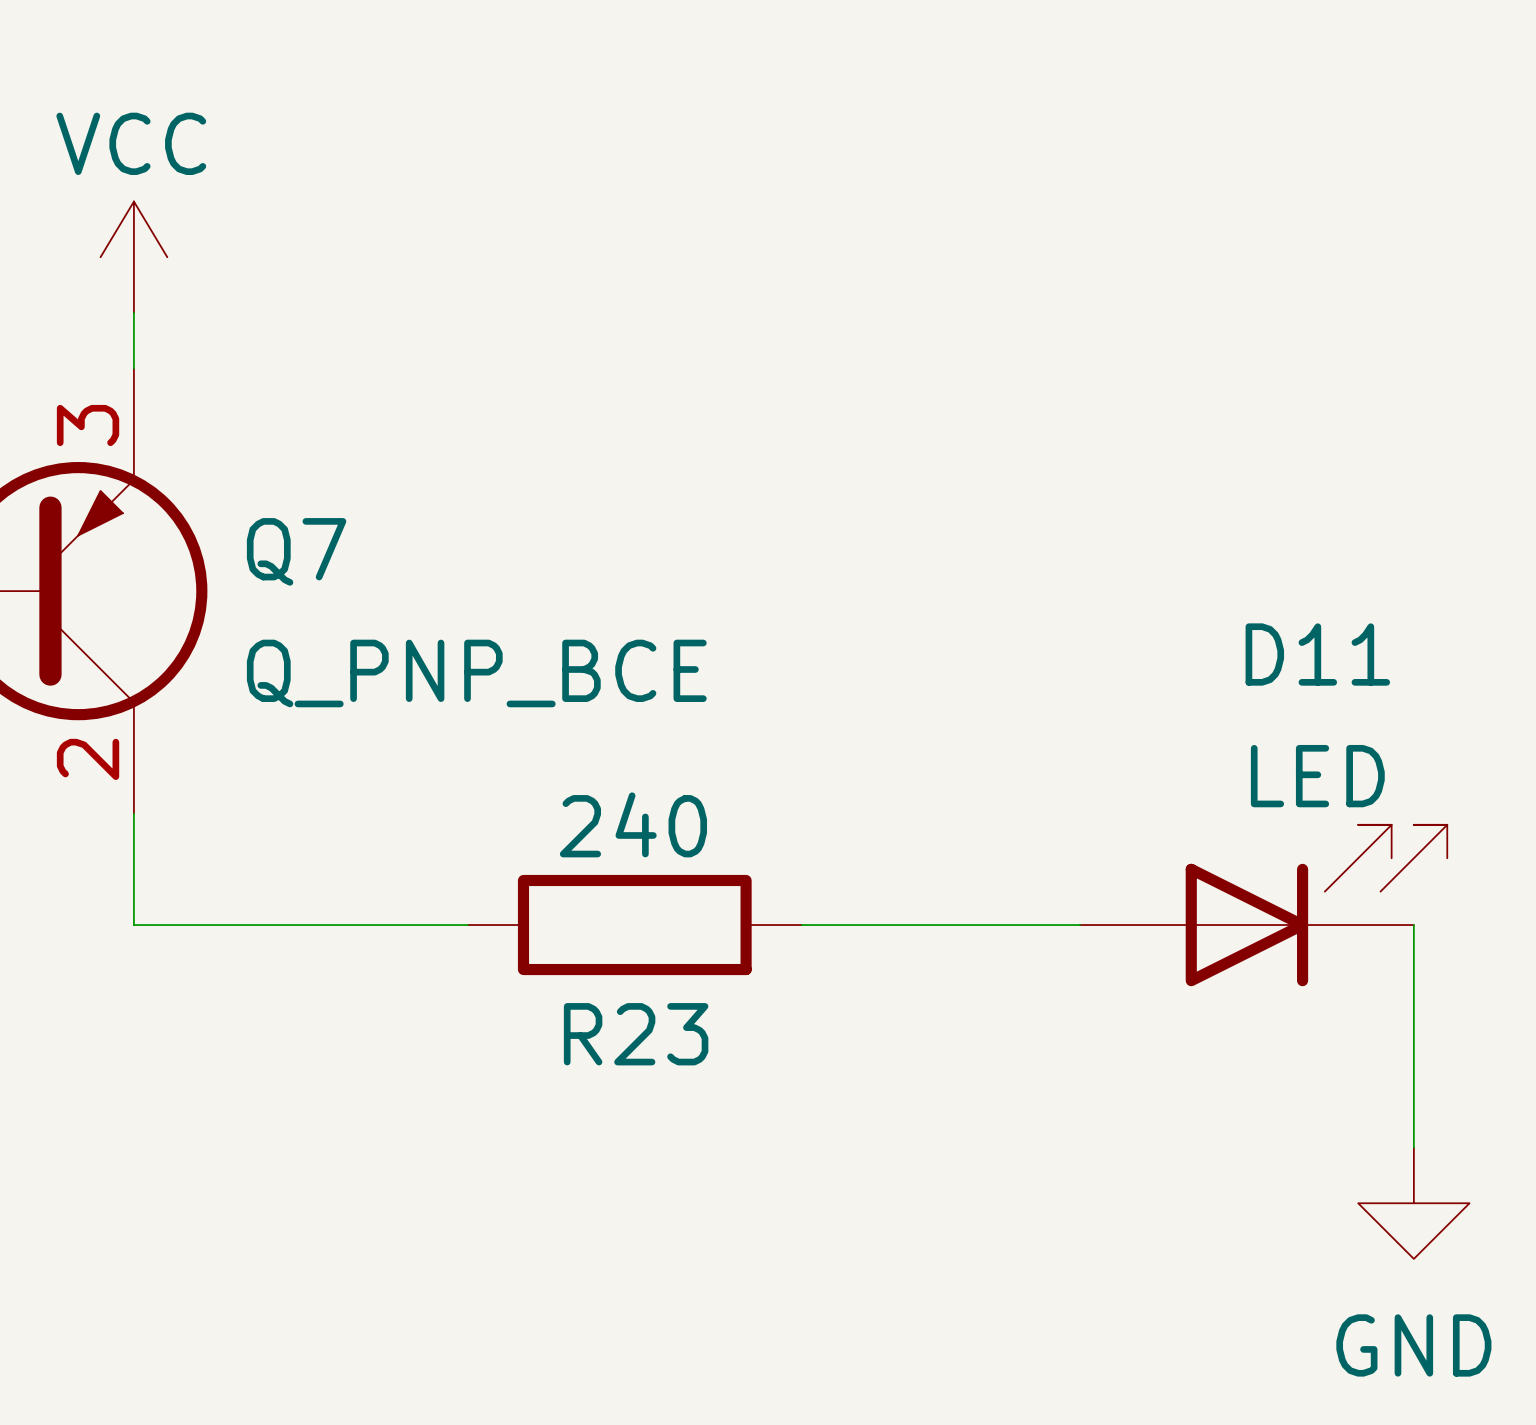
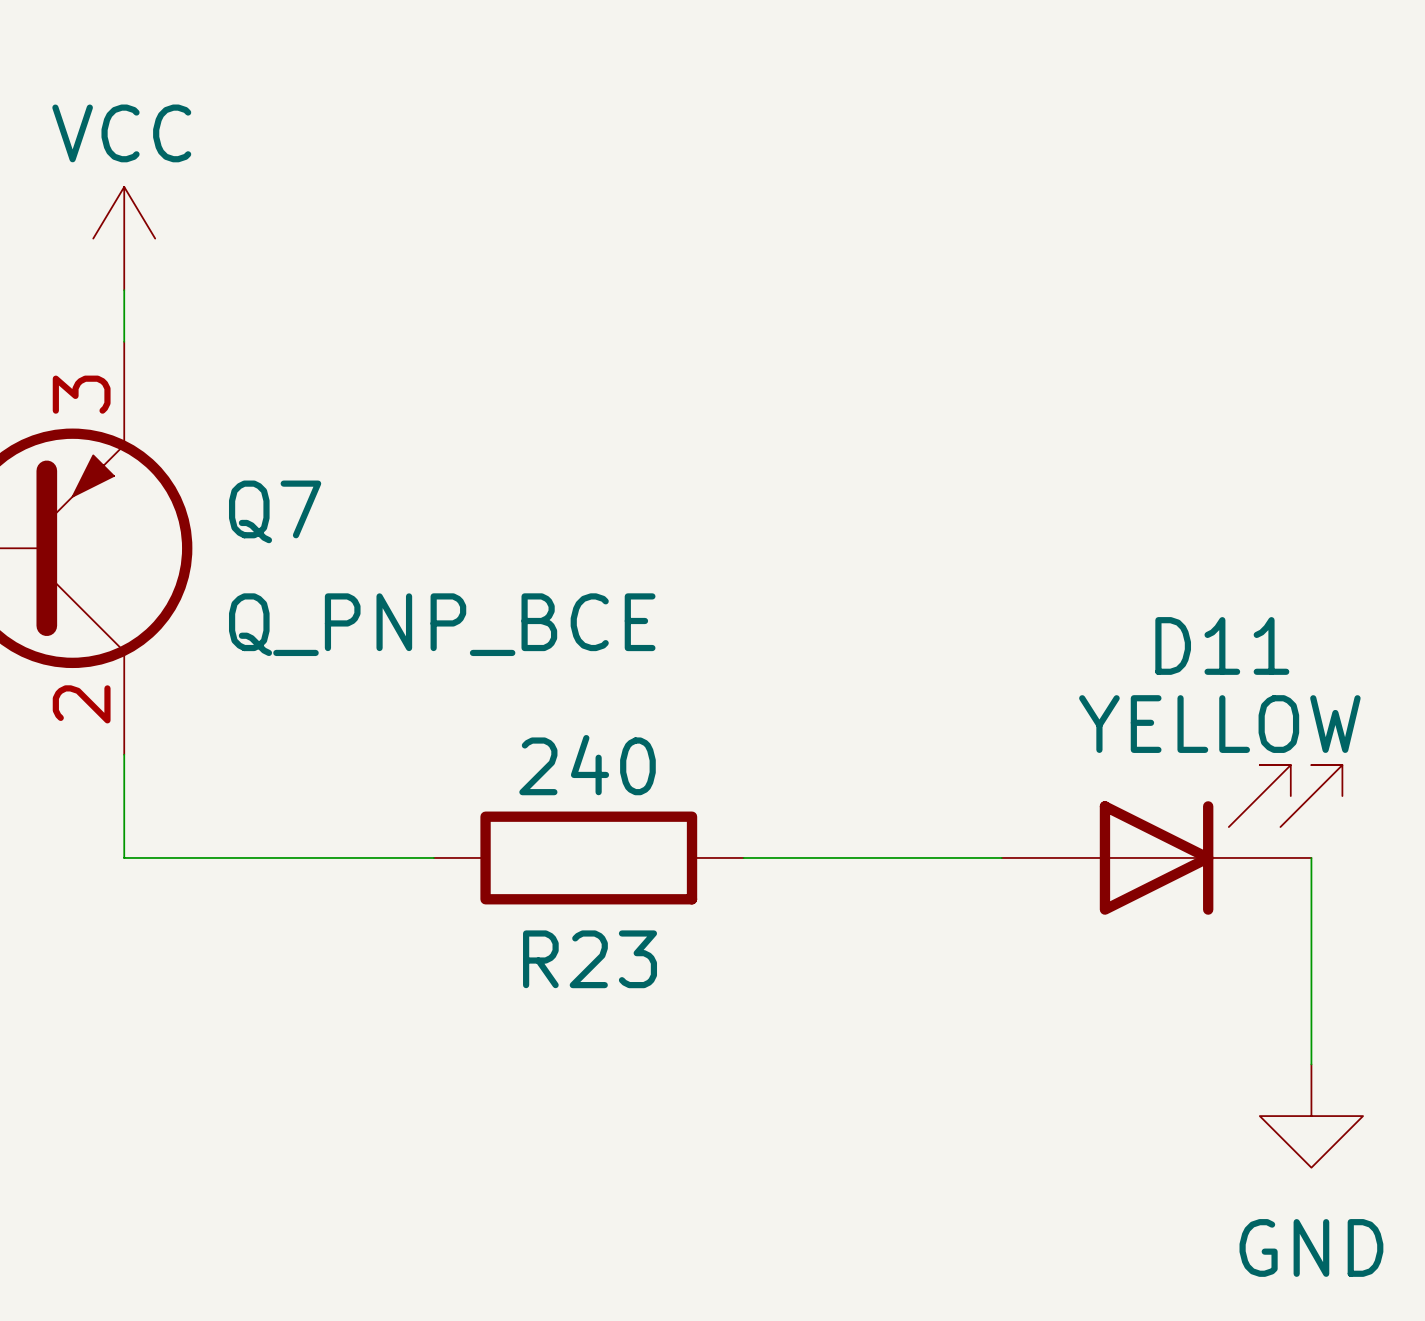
D11 name position: D11 (1317, 654) -> D11 (1222, 645)
D11 value: LED (1317, 776) -> YELLOW (1219, 724)

